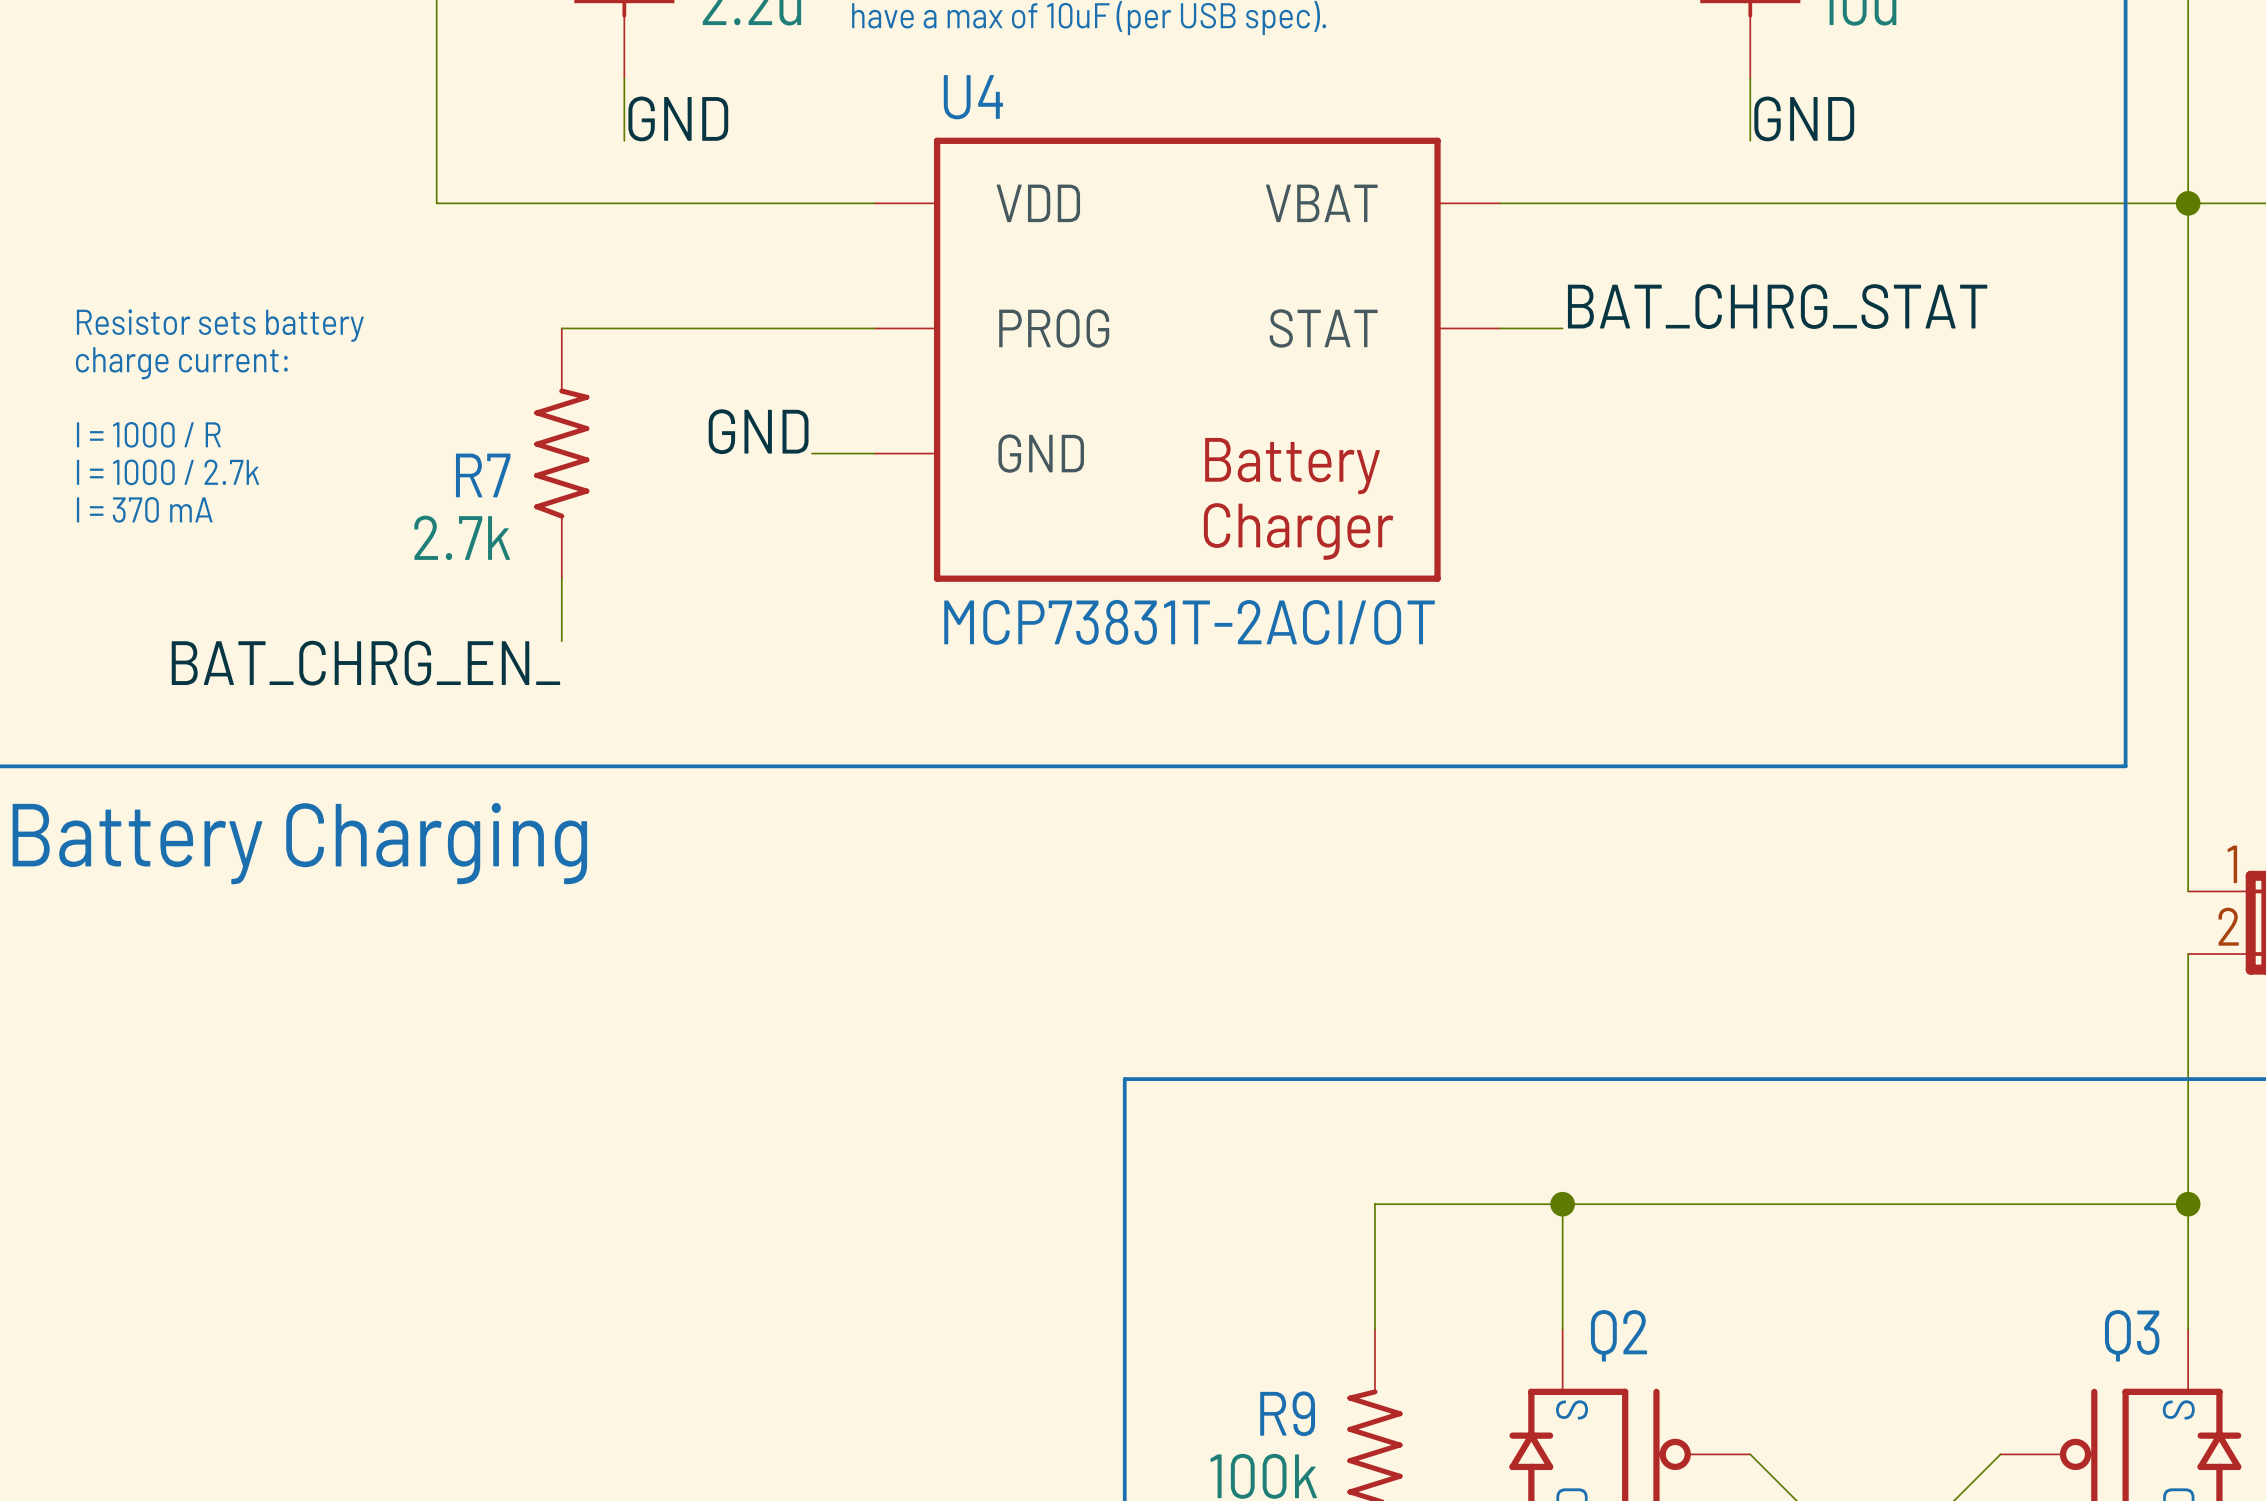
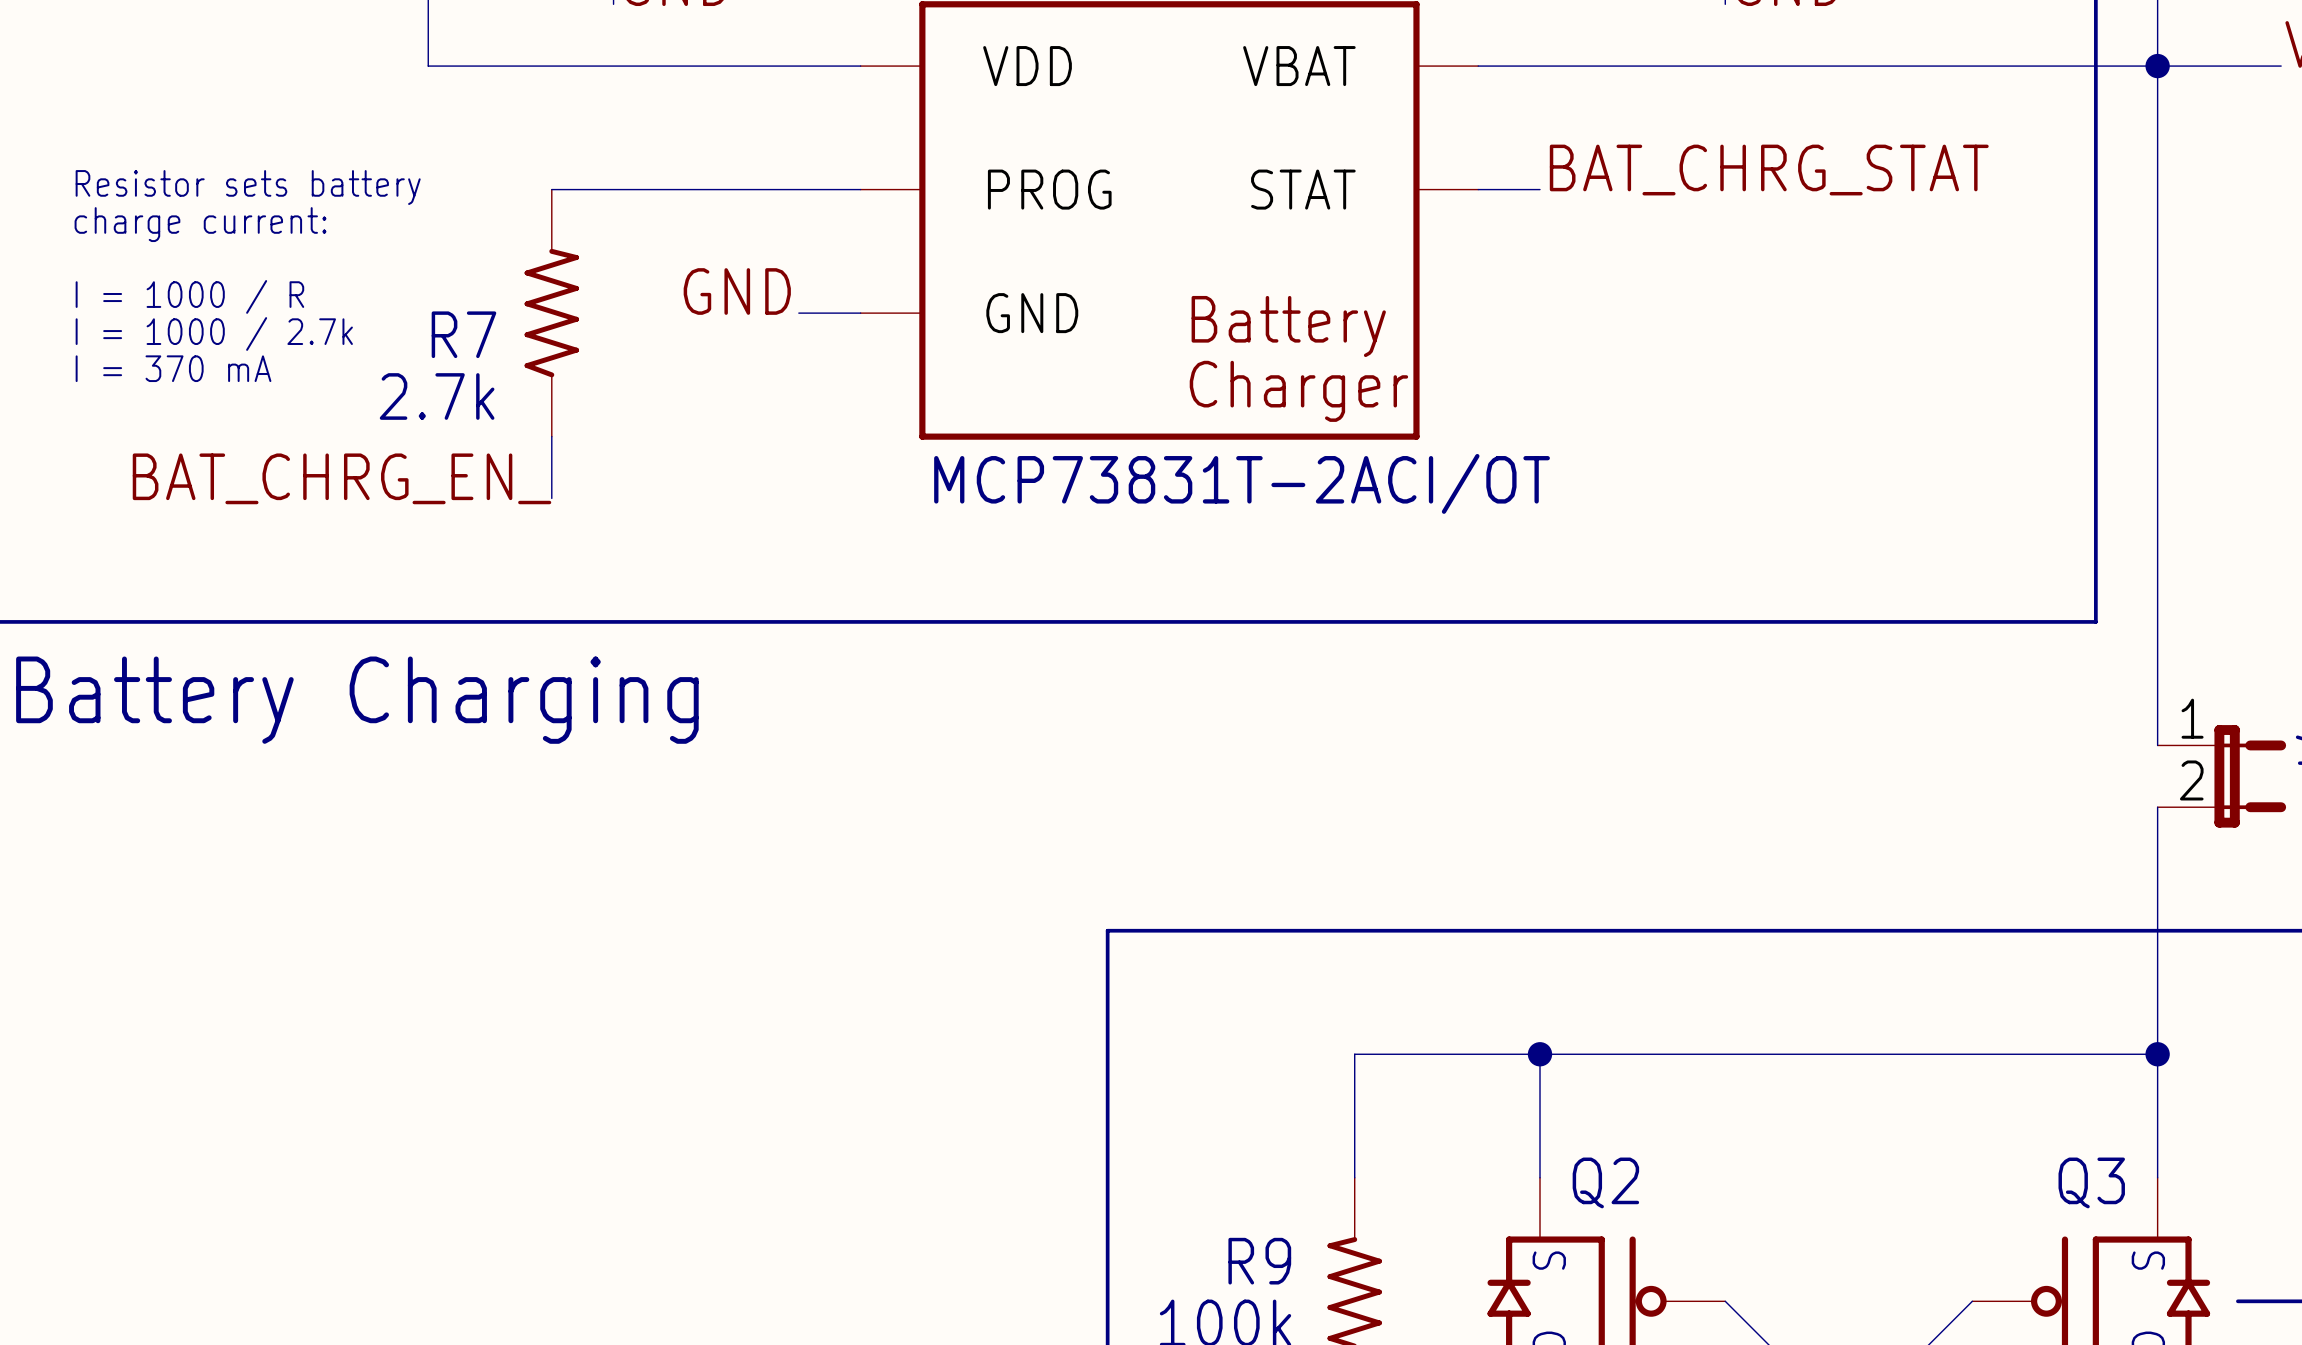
label position: BAT_CHRG_EN_ (365, 663) -> BAT_CHRG_EN_ (341, 478)

